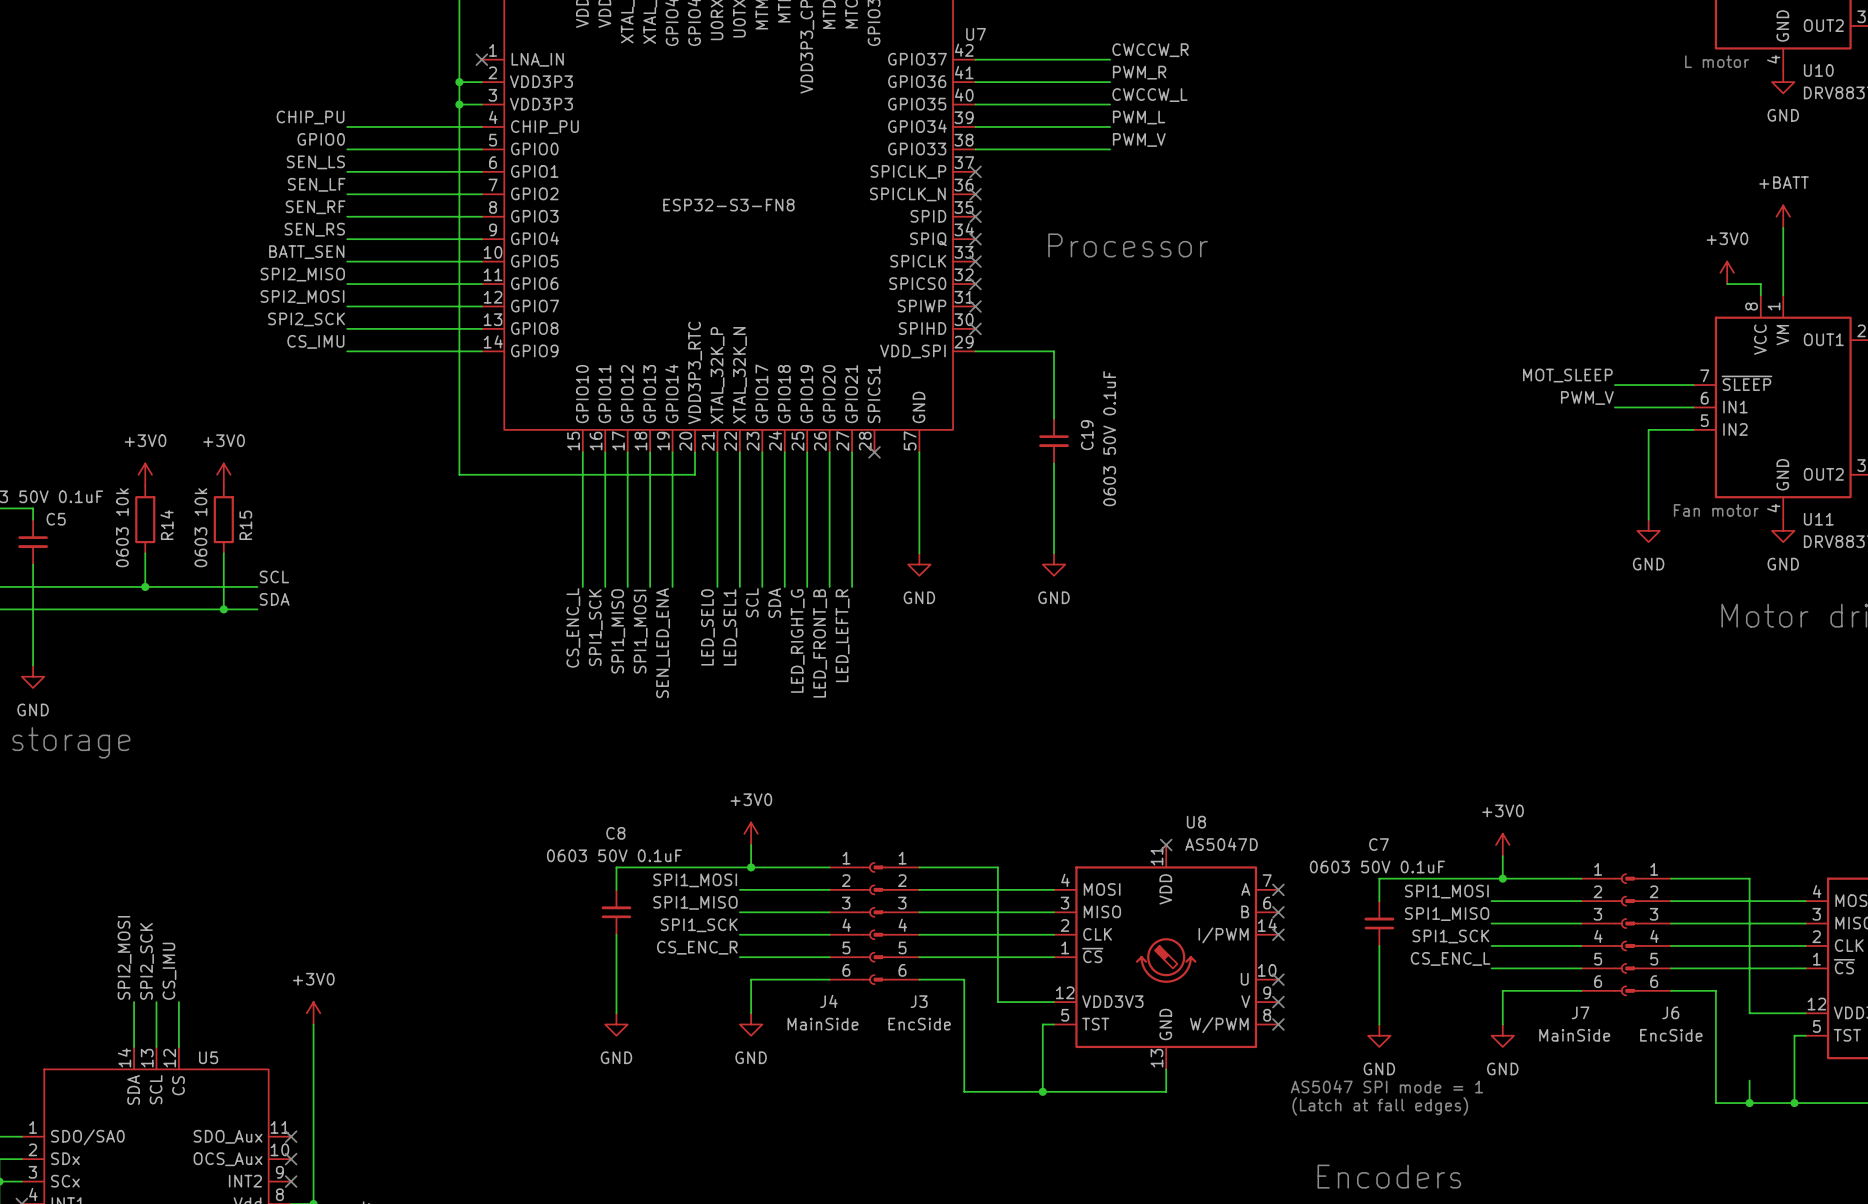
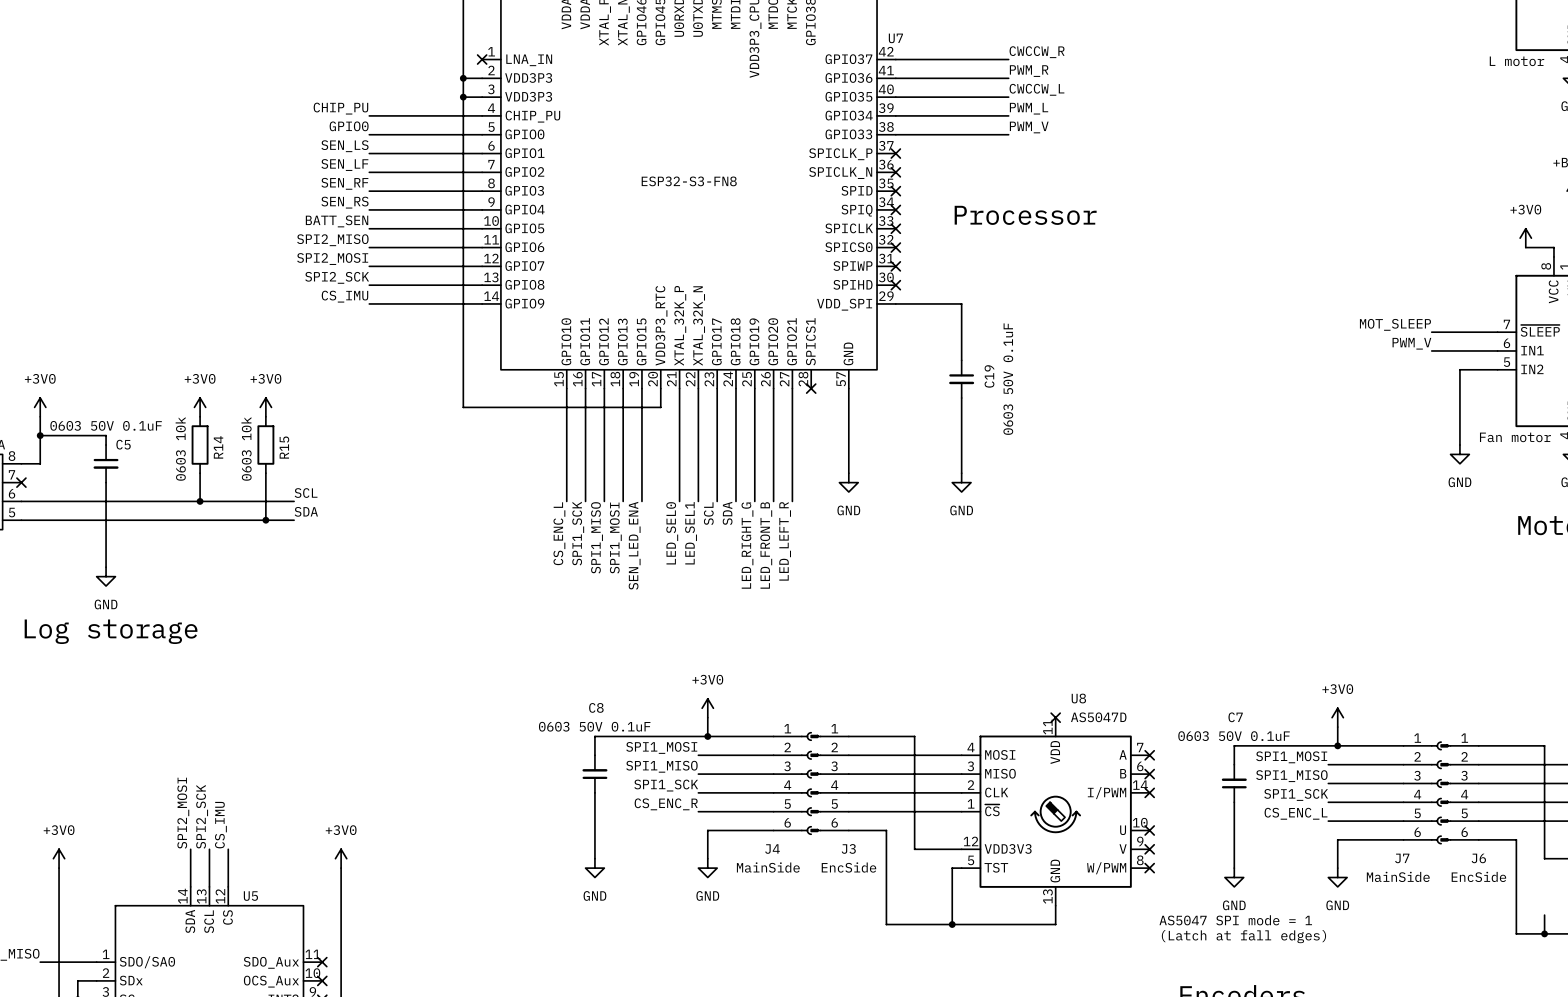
U7 pin name: GPIO14 (671, 393) -> GPIO15 (641, 341)

